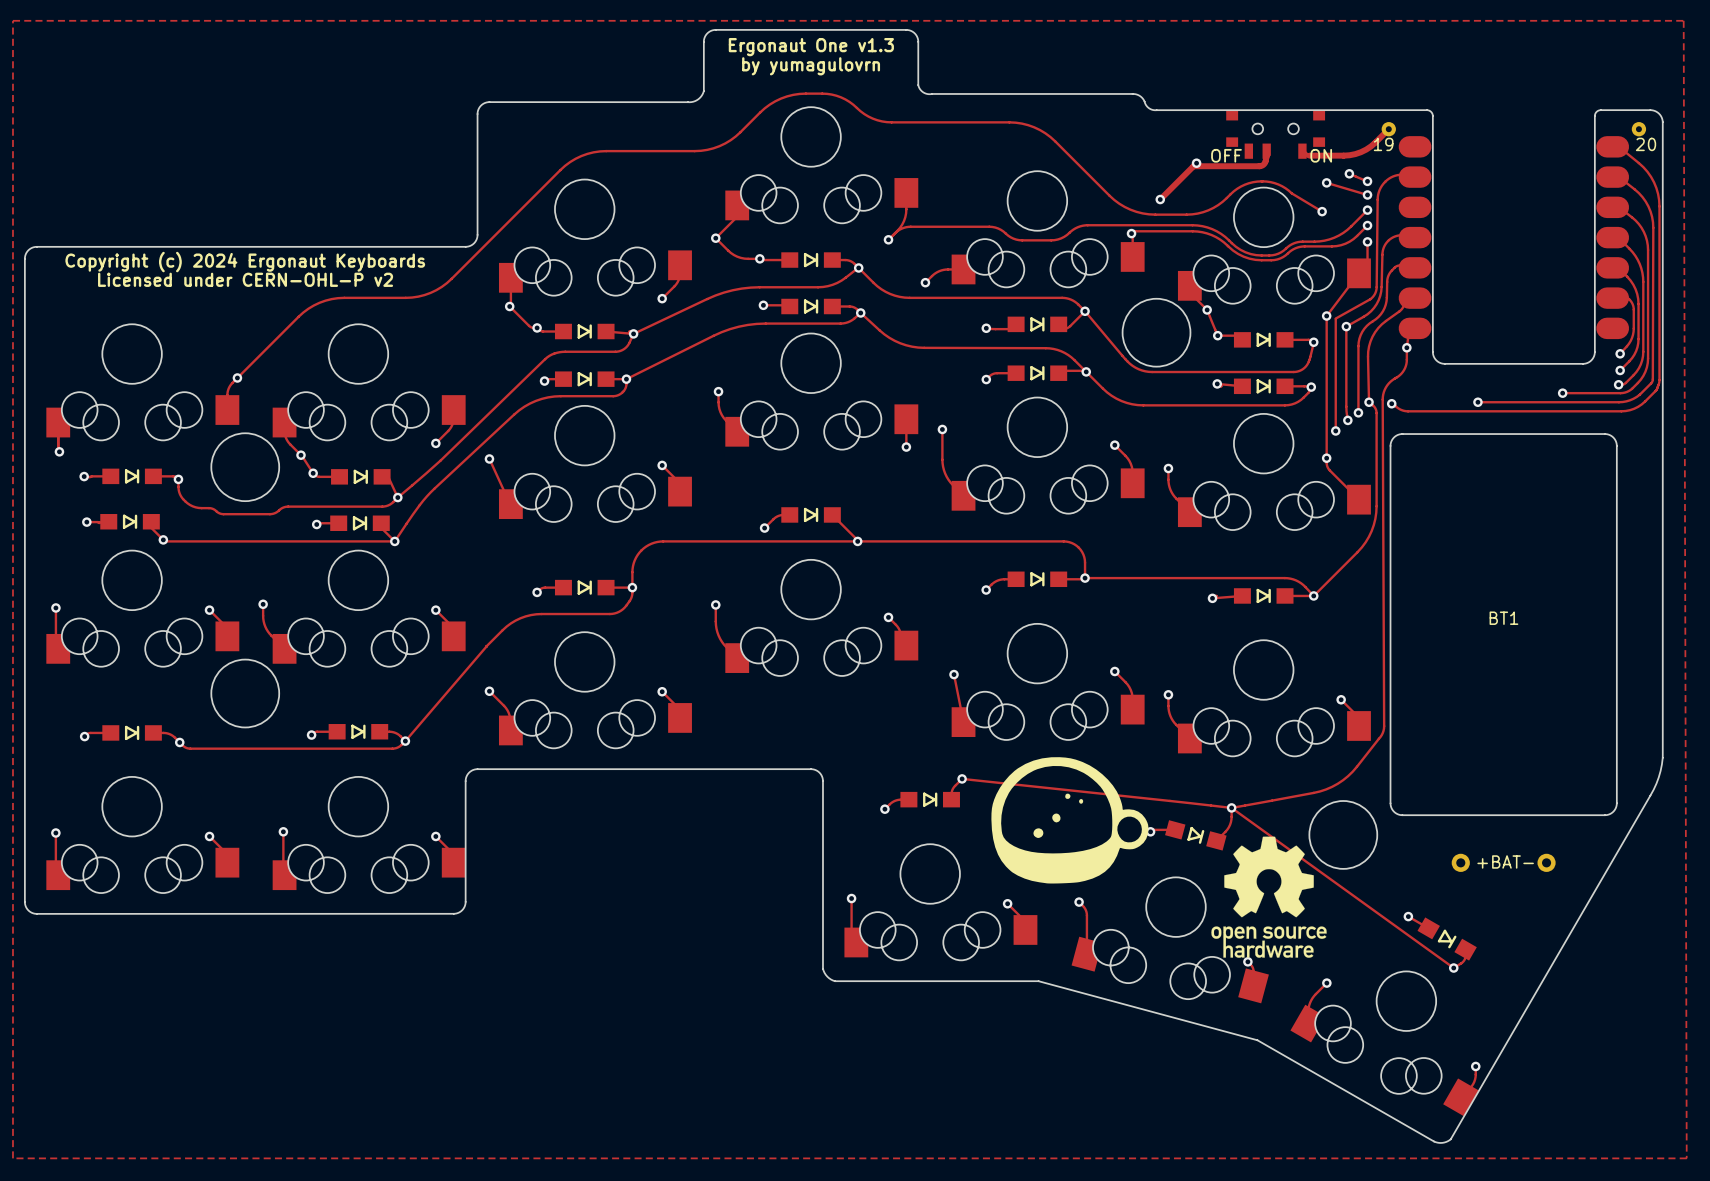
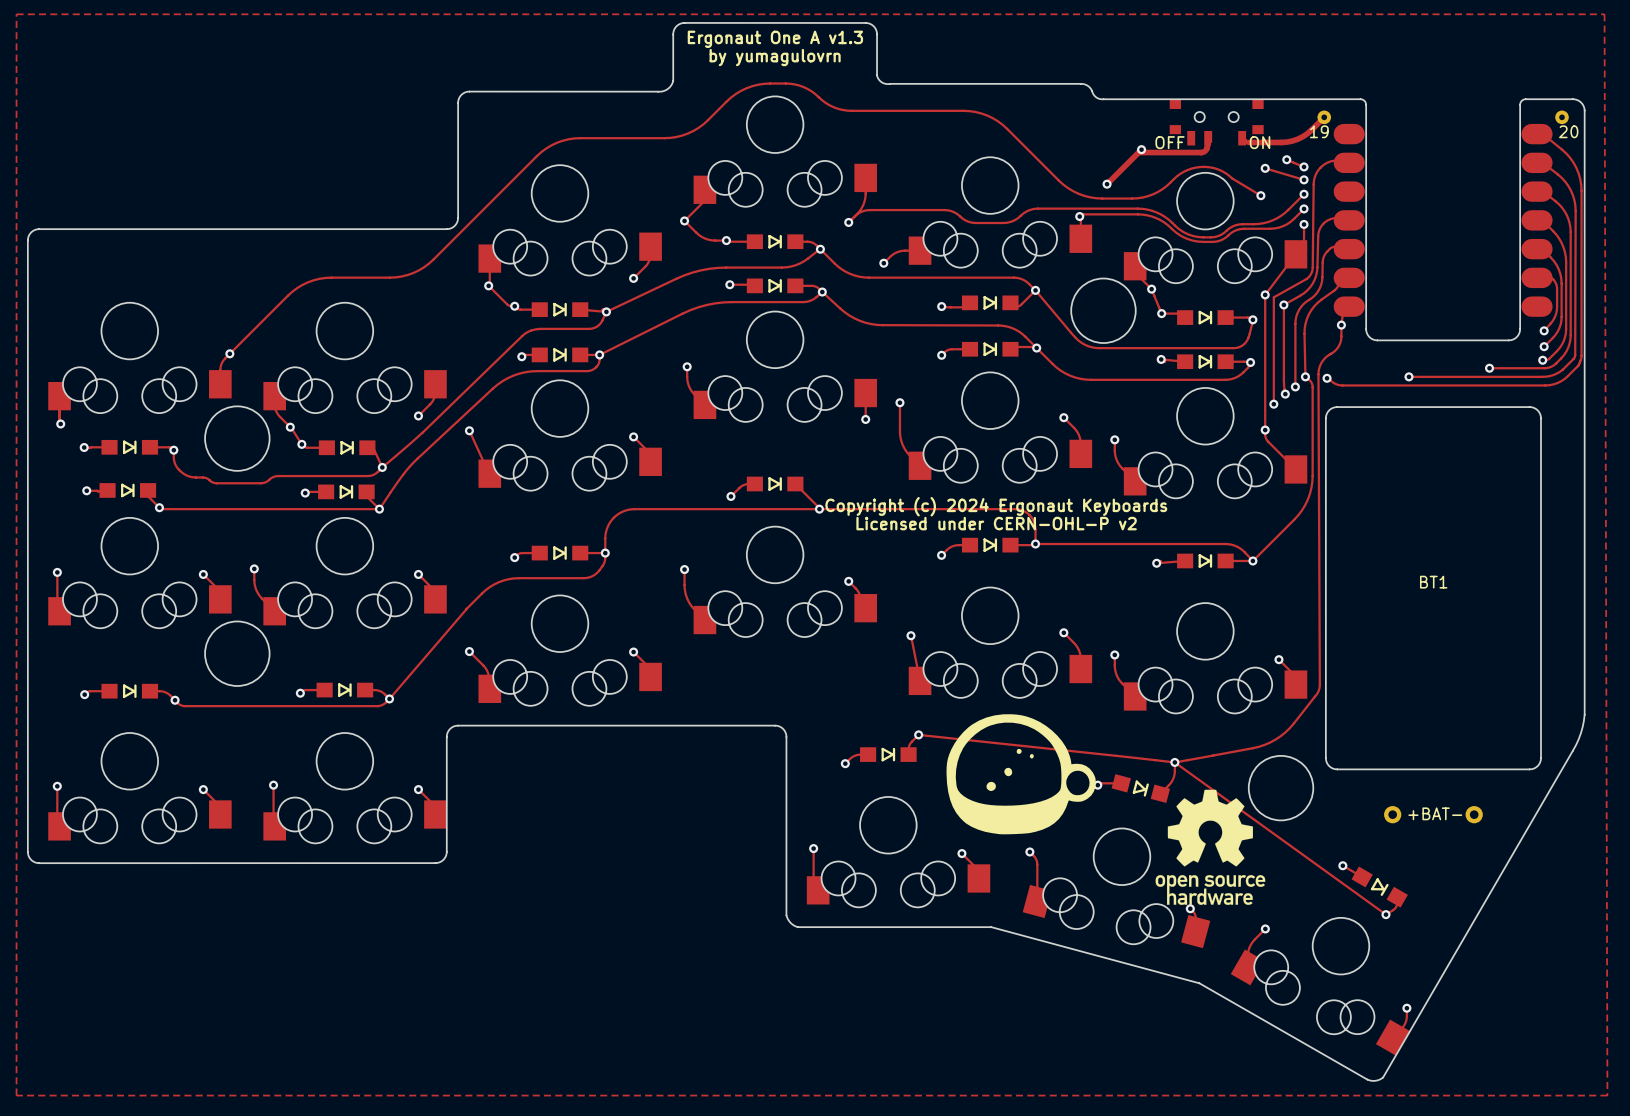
text: Ergonaut One v1.3 (811, 47) -> Ergonaut One A v1.3 (775, 39)
text: Copyright (c) 2024 Ergonaut Keyboards (245, 262) -> none
text: Licensed under CERN-OHL-P v2 (245, 279) -> none
text: none -> Copyright (c) 2024 Ergonaut Keyboards (996, 506)
text: none -> Licensed under CERN-OHL-P v2 (996, 523)

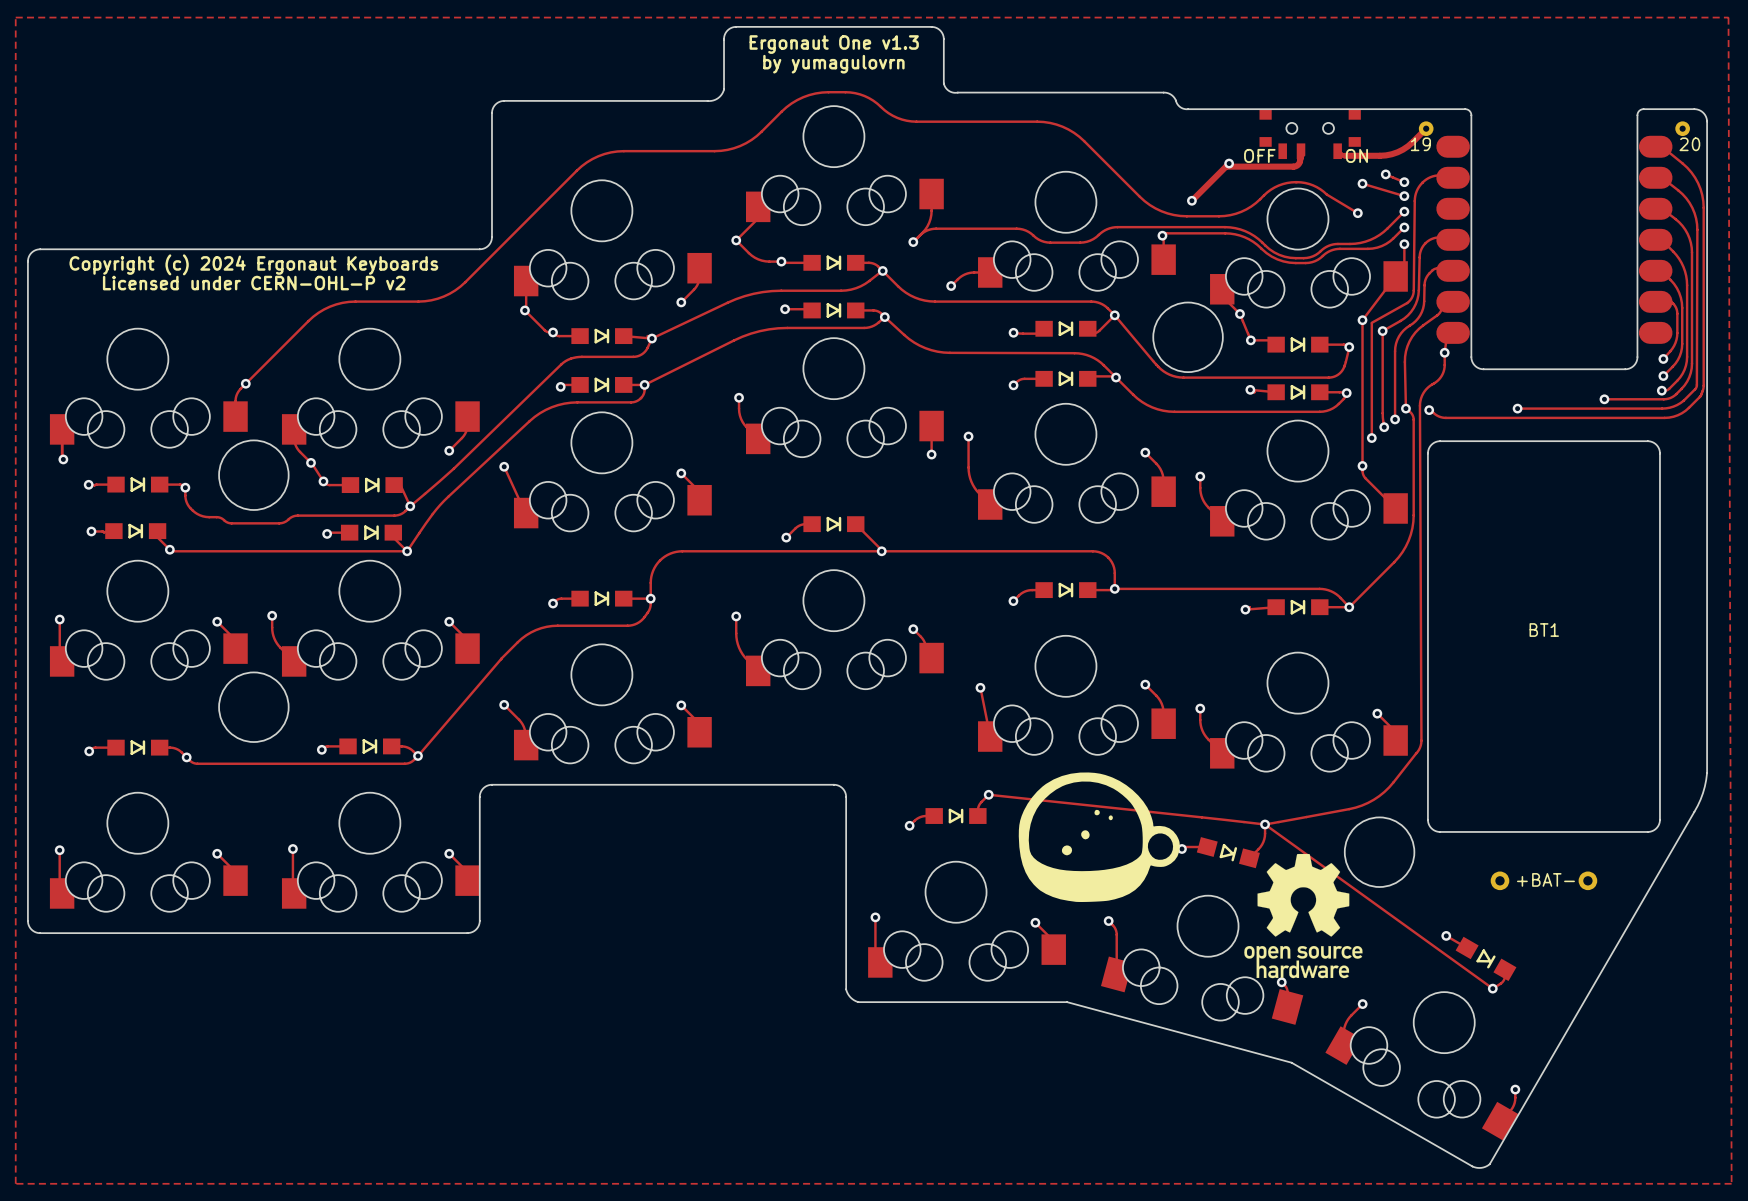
text: Ergonaut One A v1.3 (775, 39) -> Ergonaut One v1.3 (834, 44)
text: none -> Copyright (c) 2024 Ergonaut Keyboards (253, 264)
text: none -> Licensed under CERN-OHL-P v2 (254, 283)
text: Copyright (c) 2024 Ergonaut Keyboards (996, 506) -> none
text: Licensed under CERN-OHL-P v2 (996, 523) -> none

